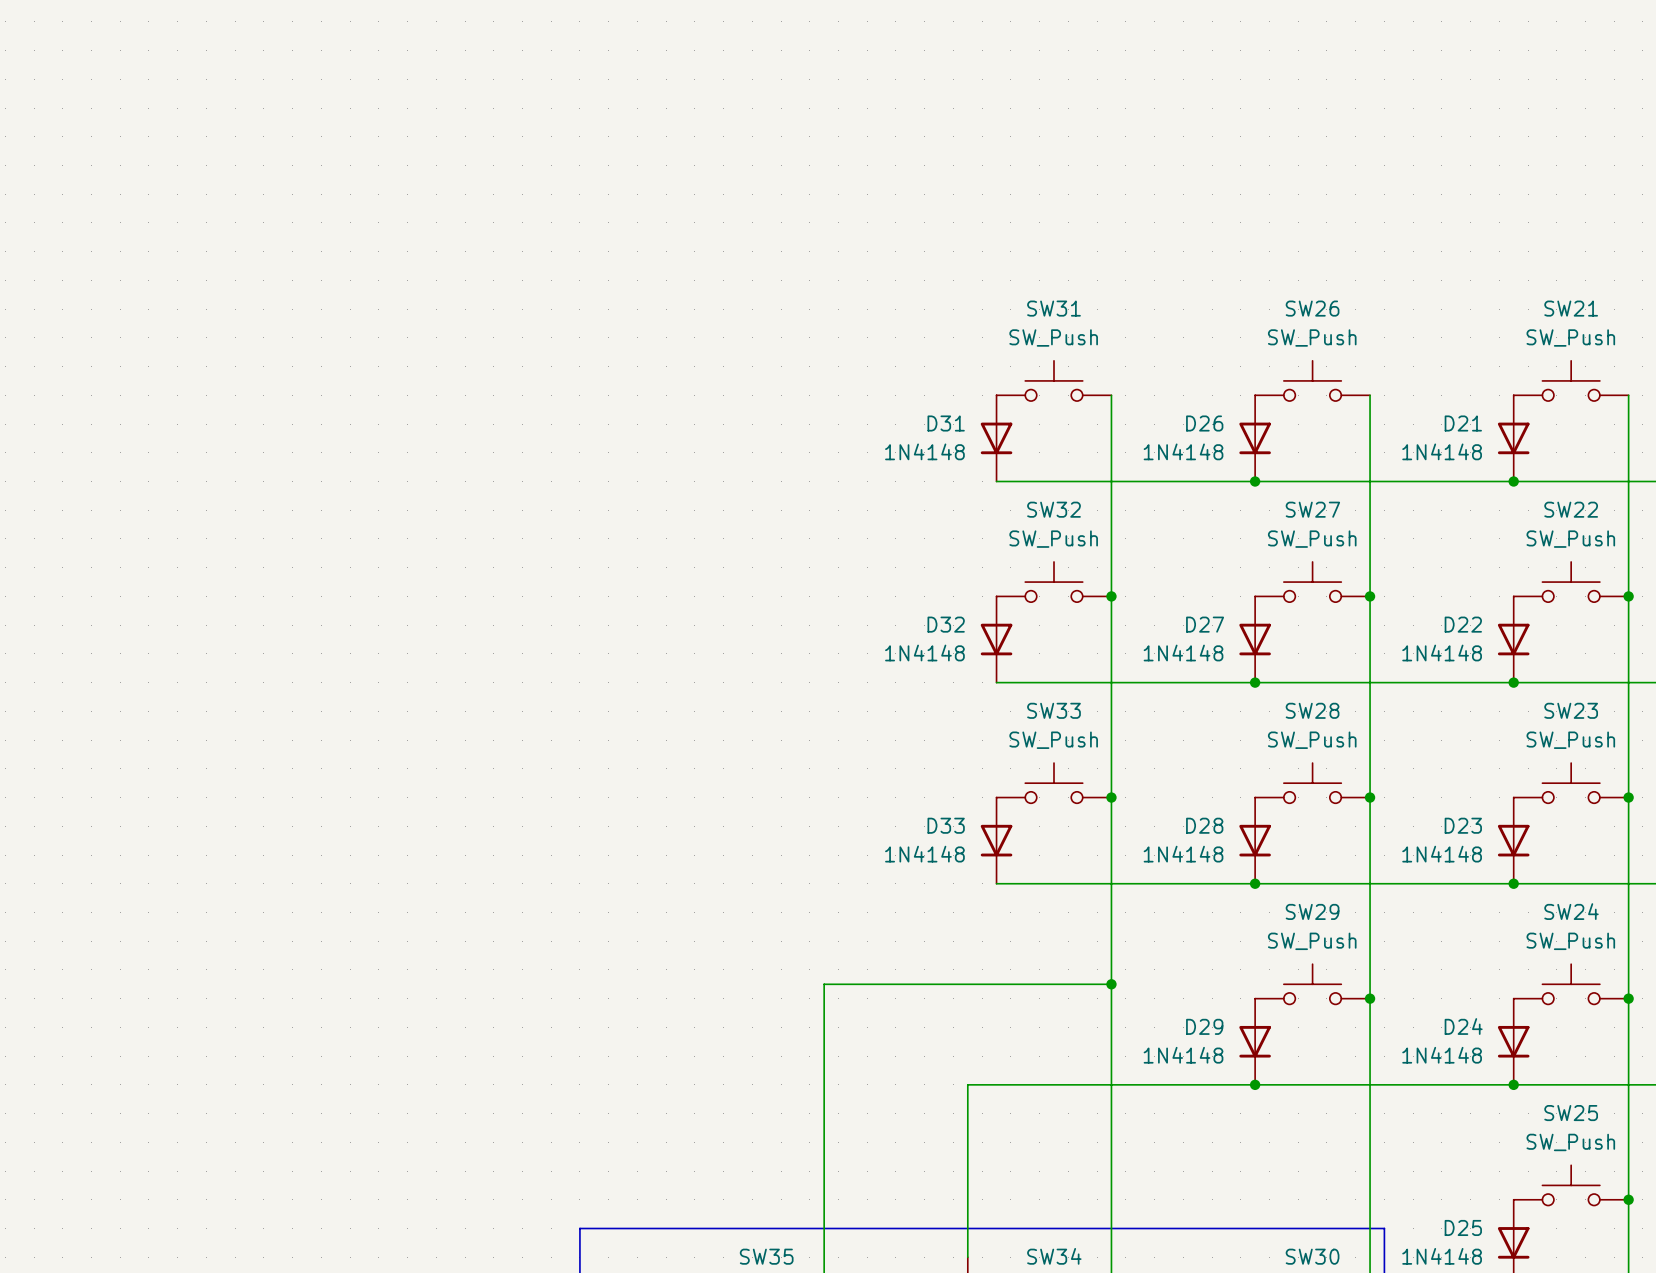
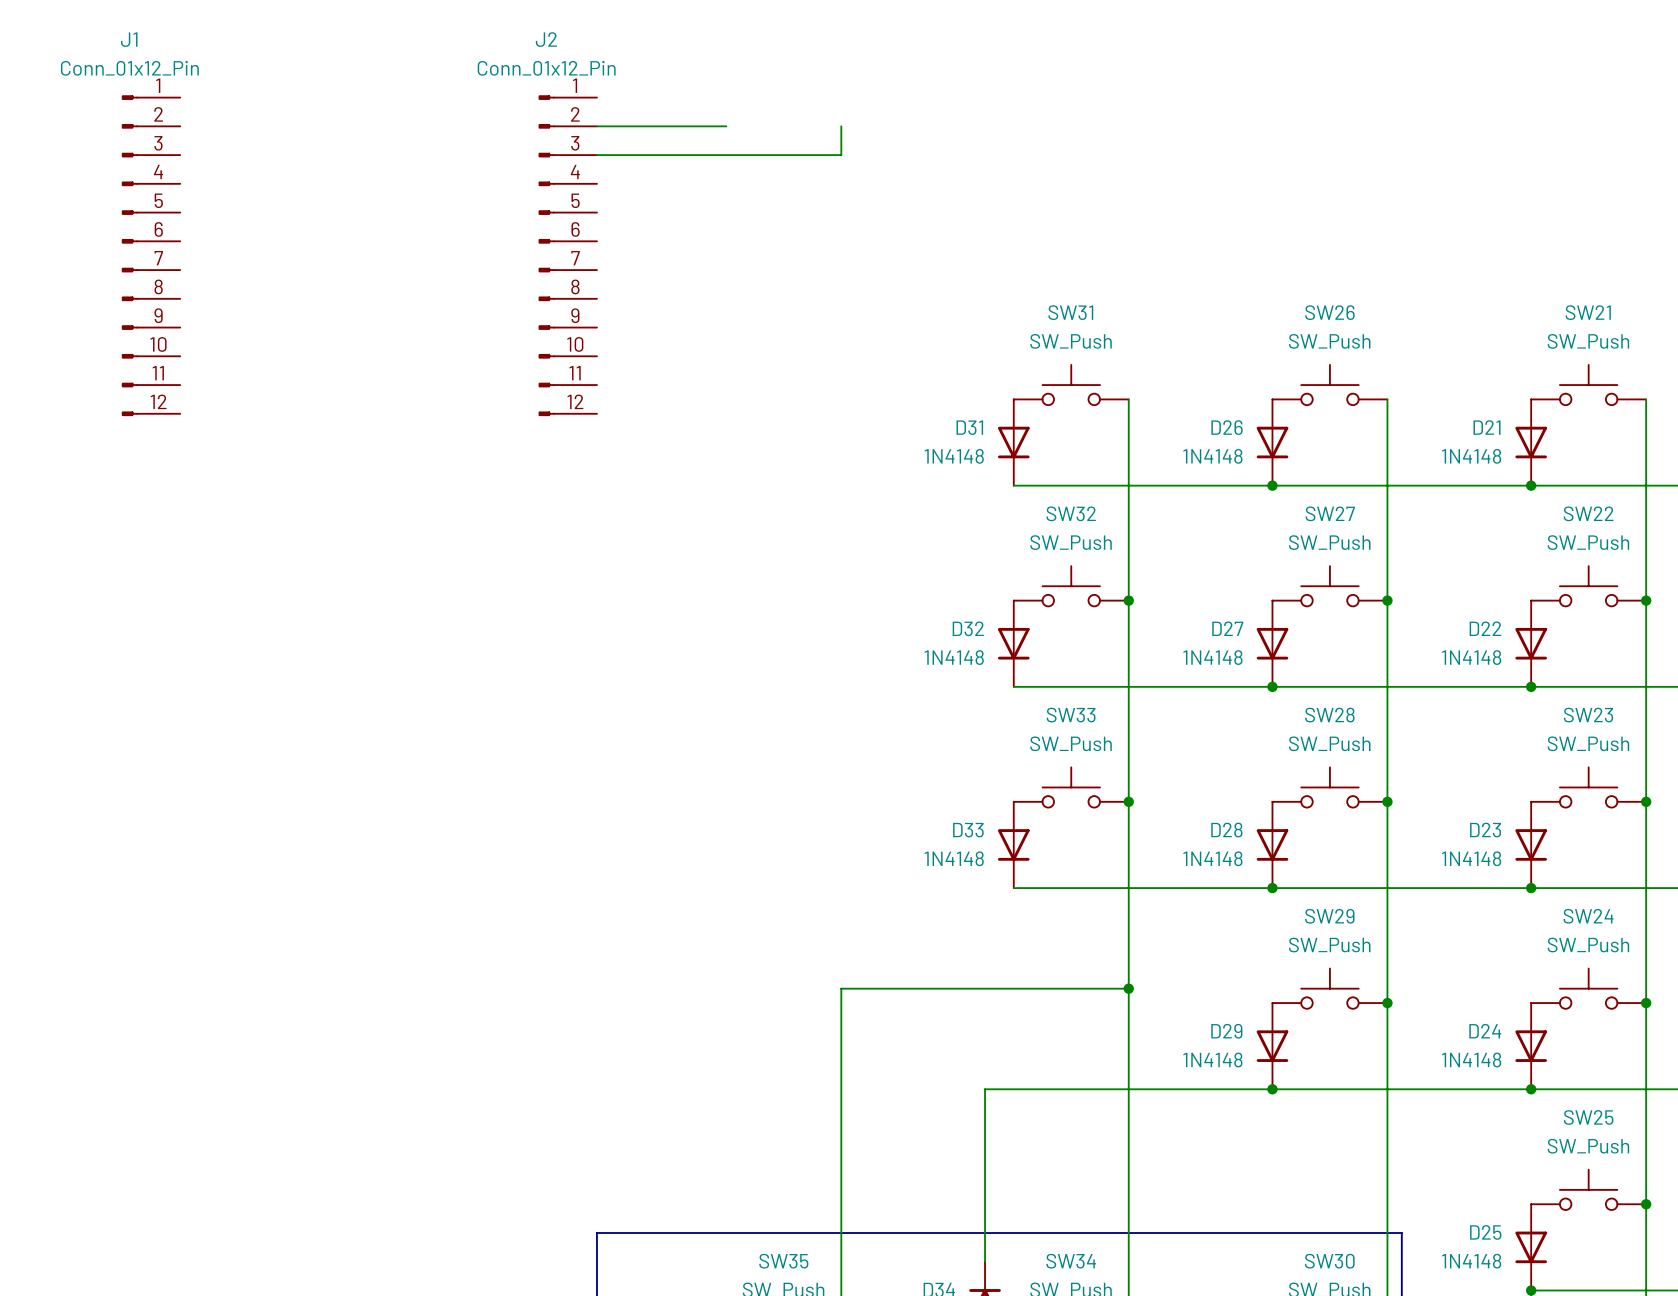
wire: none -> (596, 126) (726, 126)
wire: none -> (841, 126) (841, 155) (596, 155)
J1: none -> Conn_01x12_Pin (151, 255)
J2: none -> Conn_01x12_Pin (567, 255)

